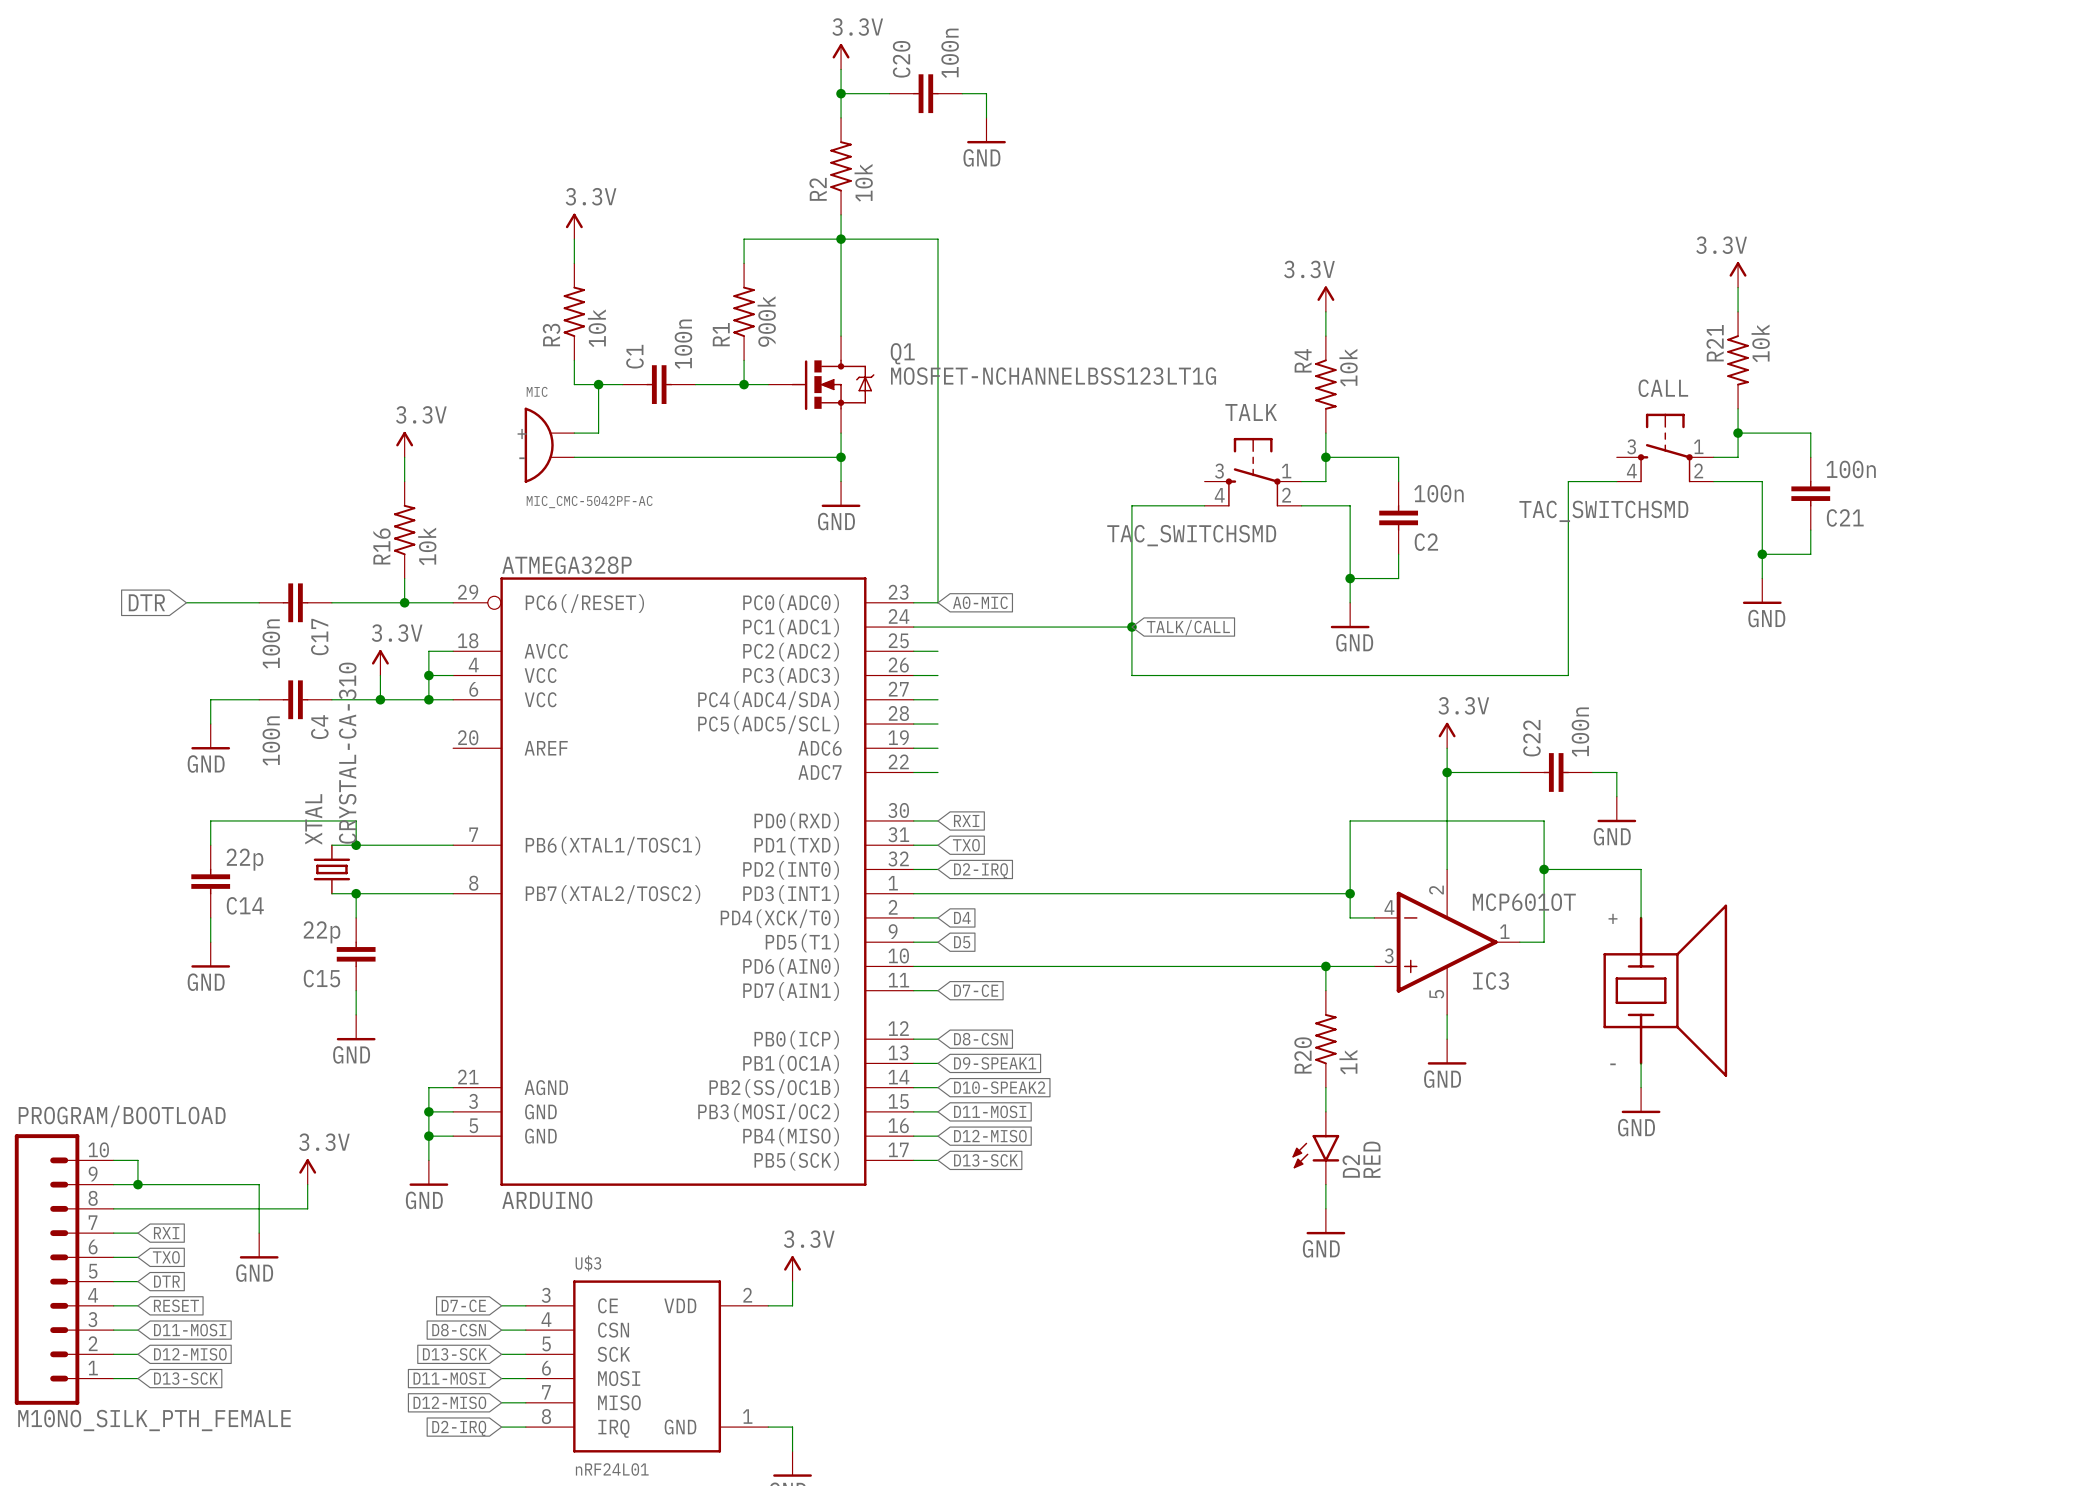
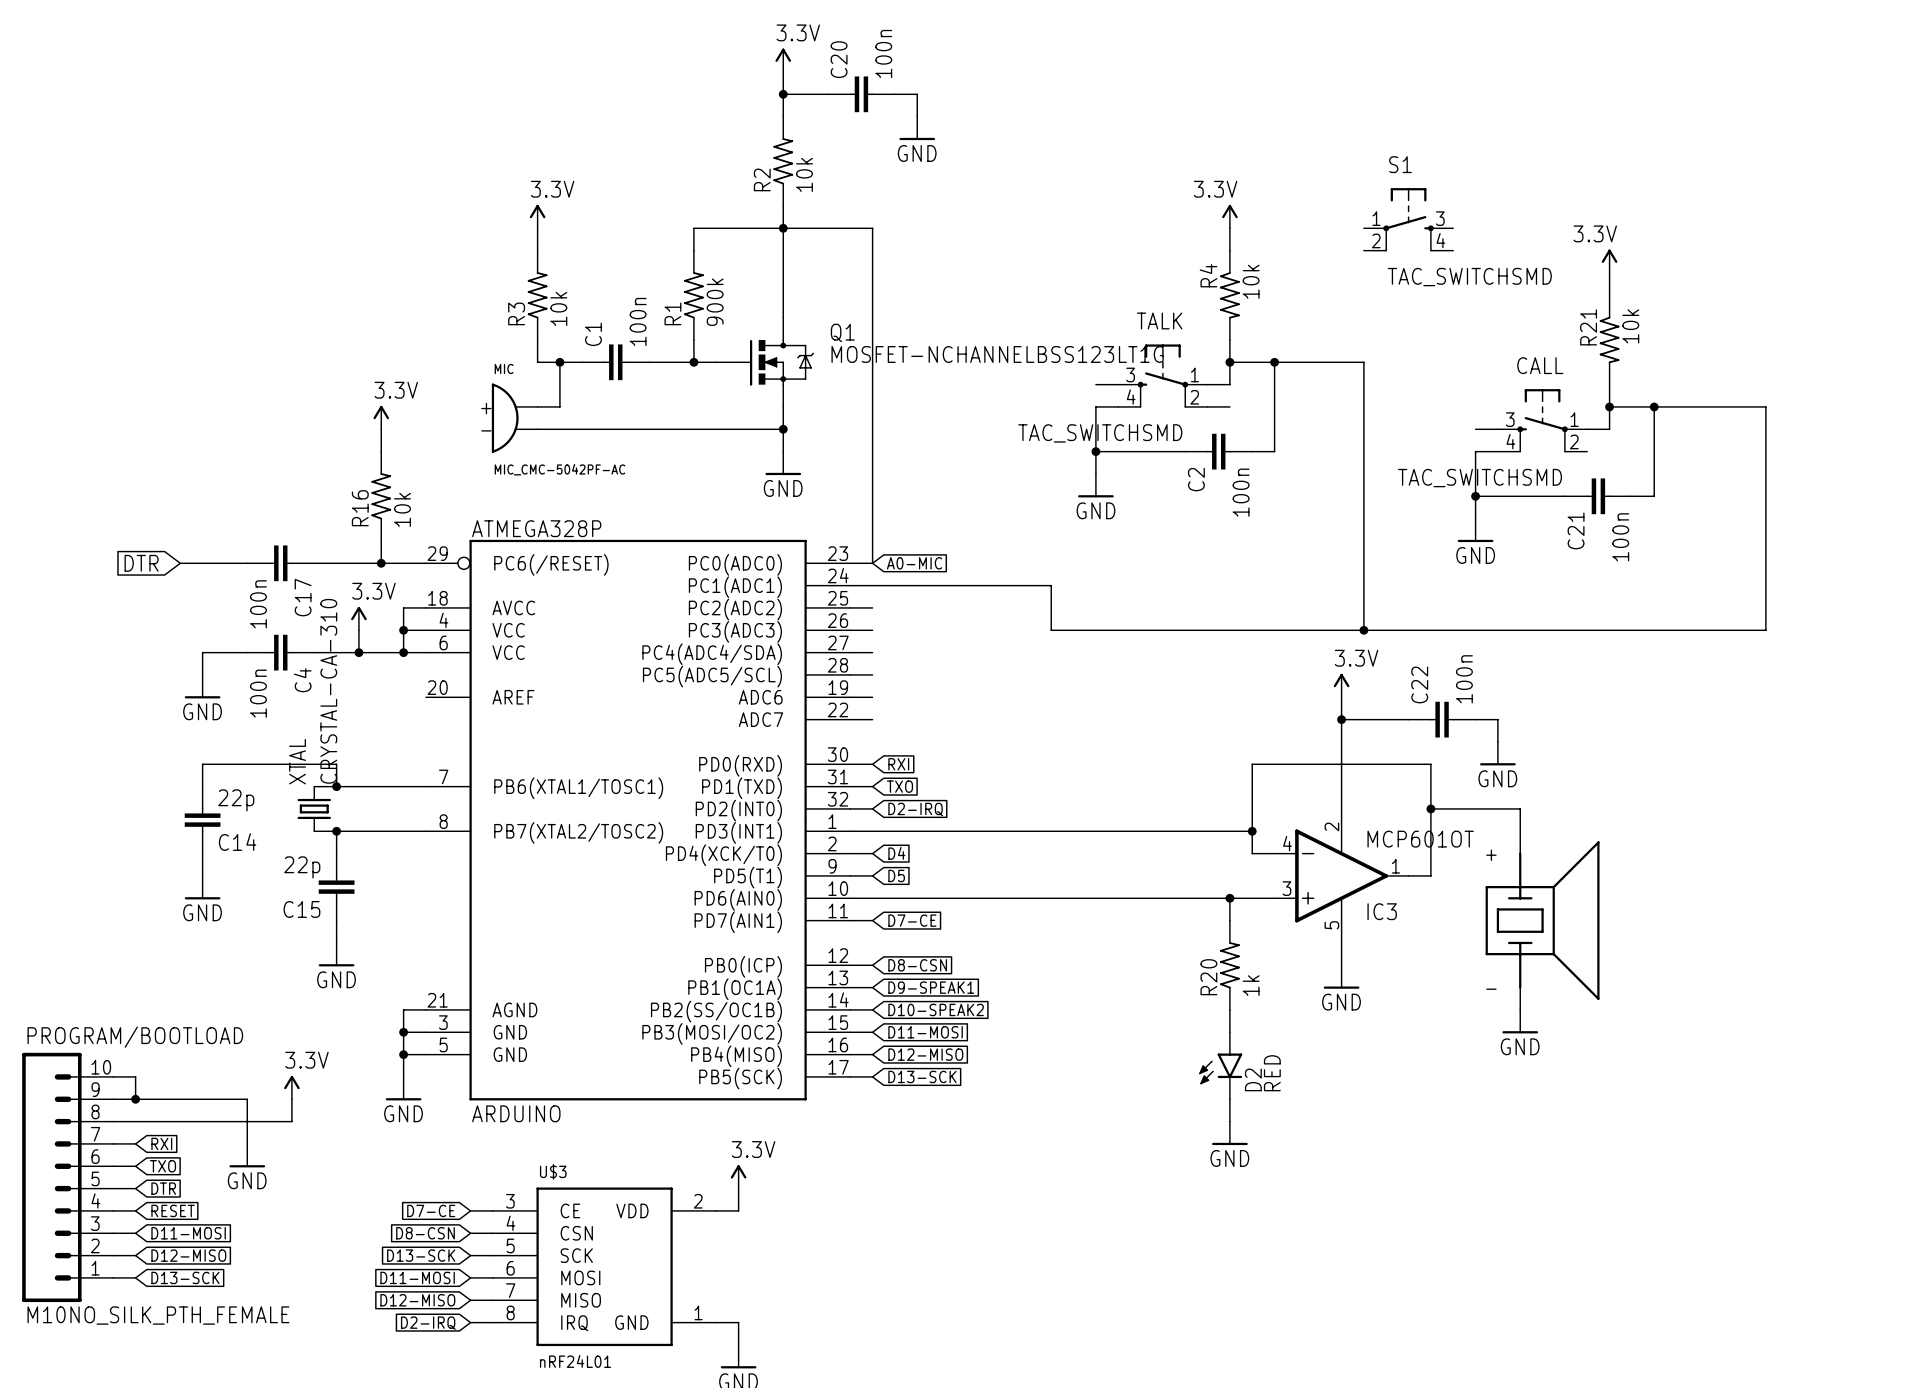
S1: none -> TAC_SWITCHSMD (1408, 219)
power symbol position: 3.3V (1325, 299) -> 3.3V (1229, 216)
wire: (1325, 311) (1325, 336) -> (1229, 228) (1229, 250)
wire: none -> (1229, 339) (1229, 384) (1207, 384)
wire: none -> (1229, 362) (1363, 362) (1363, 630)
R4 position: (1325, 384) -> (1229, 295)
junction: none -> (1229, 362)
wire: none -> (1274, 362) (1274, 451) (1252, 451)
junction: none -> (1274, 362)
wire: none -> (1095, 384) (1118, 384)
wire: none -> (1118, 406) (1095, 406) (1095, 473)
wire: (1325, 433) (1325, 481) (1301, 481) -> (1229, 406) (1207, 406)
wire: none -> (1654, 406) (1654, 496) (1631, 496)
junction: none -> (1654, 406)
wire: (1810, 433) (1810, 457) -> (1676, 406) (1765, 406) (1765, 630) (1453, 630)
wire: (1325, 457) (1398, 457) (1398, 481) -> none
junction: (1325, 457) -> none
wire: none -> (1475, 429) (1497, 429)
TALK position: (1253, 472) -> (1162, 376)
wire: none -> (1095, 451) (1185, 451)
junction: none -> (1095, 451)
wire: (1592, 481) (1568, 481) (1568, 675) -> (1475, 451) (1475, 518)
wire: (1713, 481) (1762, 481) (1762, 578) -> none
C21 rotation: 0° (1810, 493) -> 90° clockwise (1598, 496)
C21 position: (1810, 493) -> (1598, 496)
wire: (1204, 505) (1131, 505) (1131, 627) -> none
wire: (1301, 505) (1350, 505) (1350, 602) -> none
C2 rotation: 0° (1398, 517) -> 90° clockwise (1218, 451)
C2 position: (1398, 517) -> (1218, 451)
power symbol: none -> GND (1095, 485)
wire: none -> (1475, 496) (1564, 496)
junction: none -> (1475, 496)
wire: (1810, 530) (1810, 554) (1762, 554) -> none
wire: (1398, 554) (1398, 578) (1350, 578) -> none
junction: (1762, 554) -> none
power symbol: none -> GND (1475, 530)
junction: (1350, 578) -> none
power symbol: GND (1762, 591) -> none
power symbol: GND (1350, 615) -> none
junction: (1131, 627) -> none
global label: TALK/CALL (1188, 627) -> none
junction: none -> (1363, 630)

